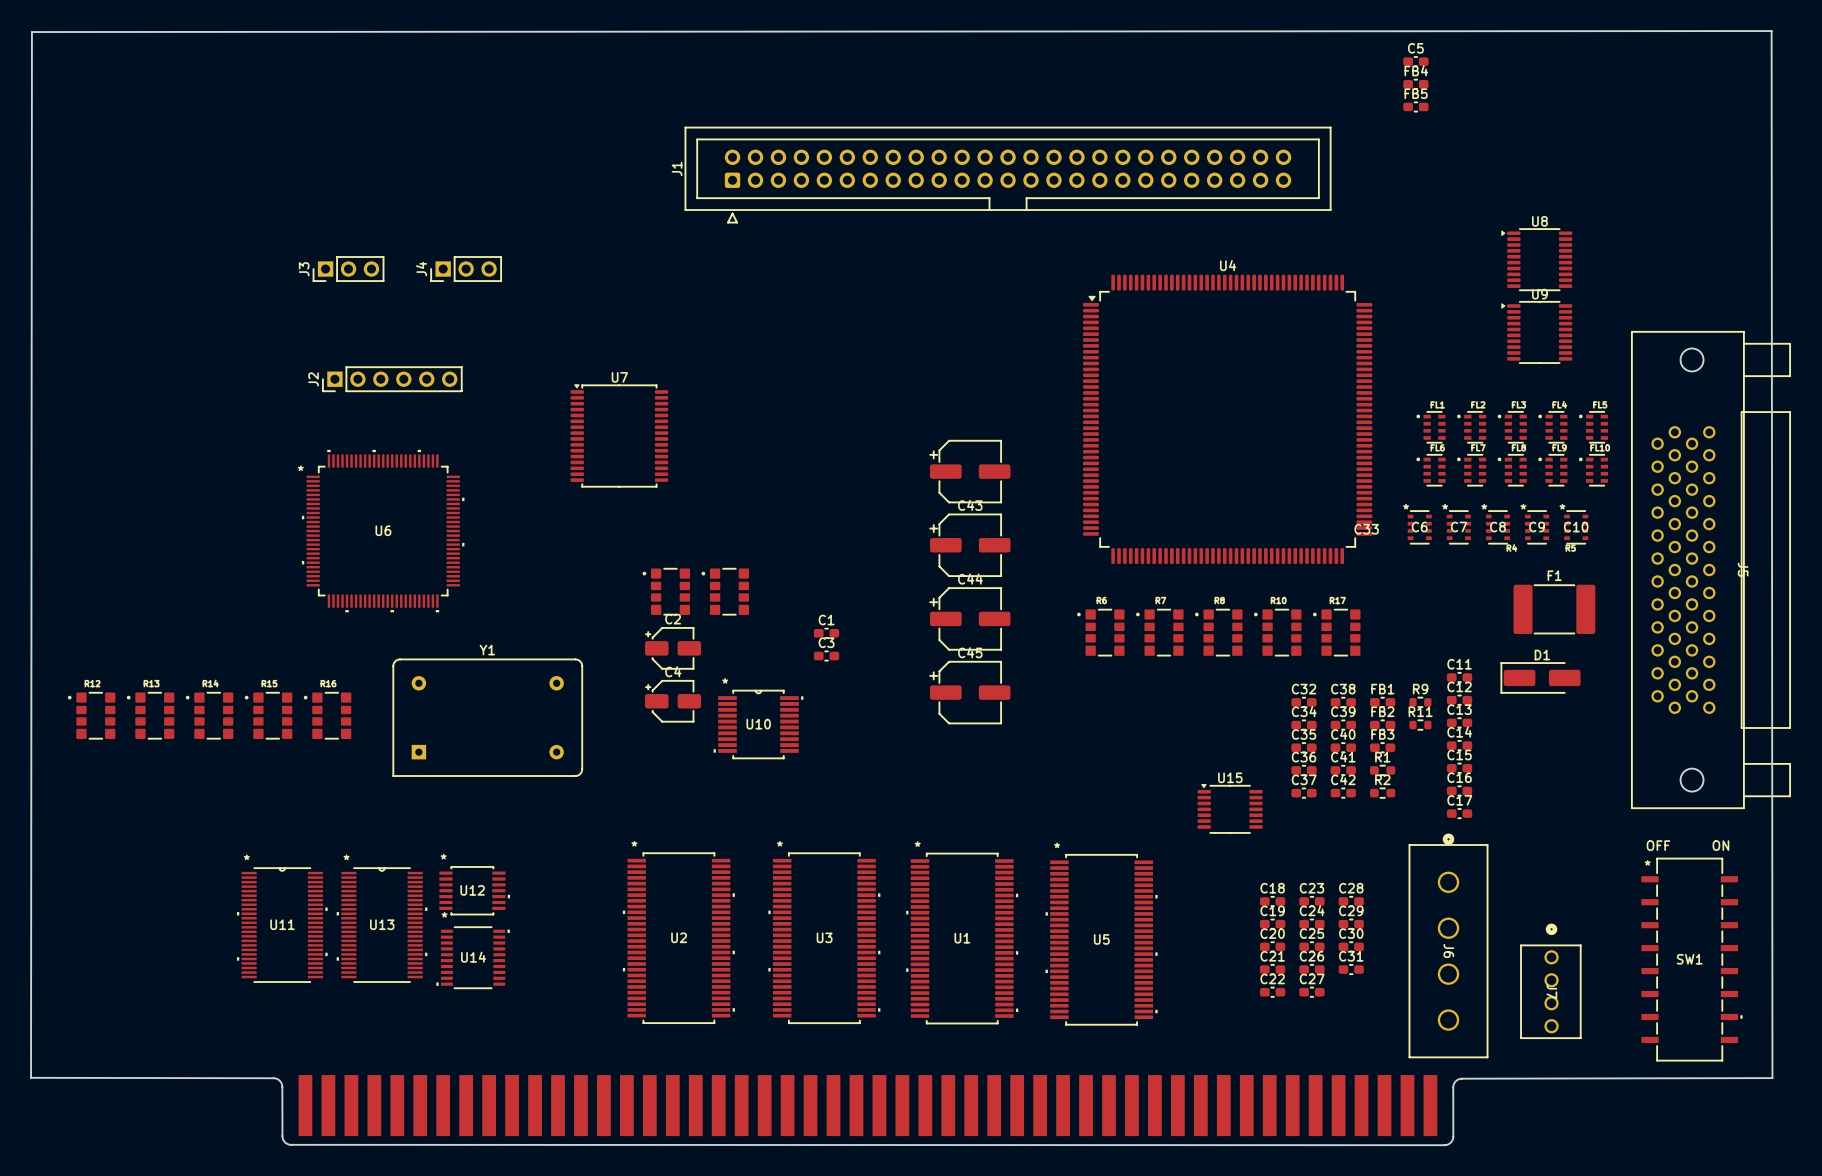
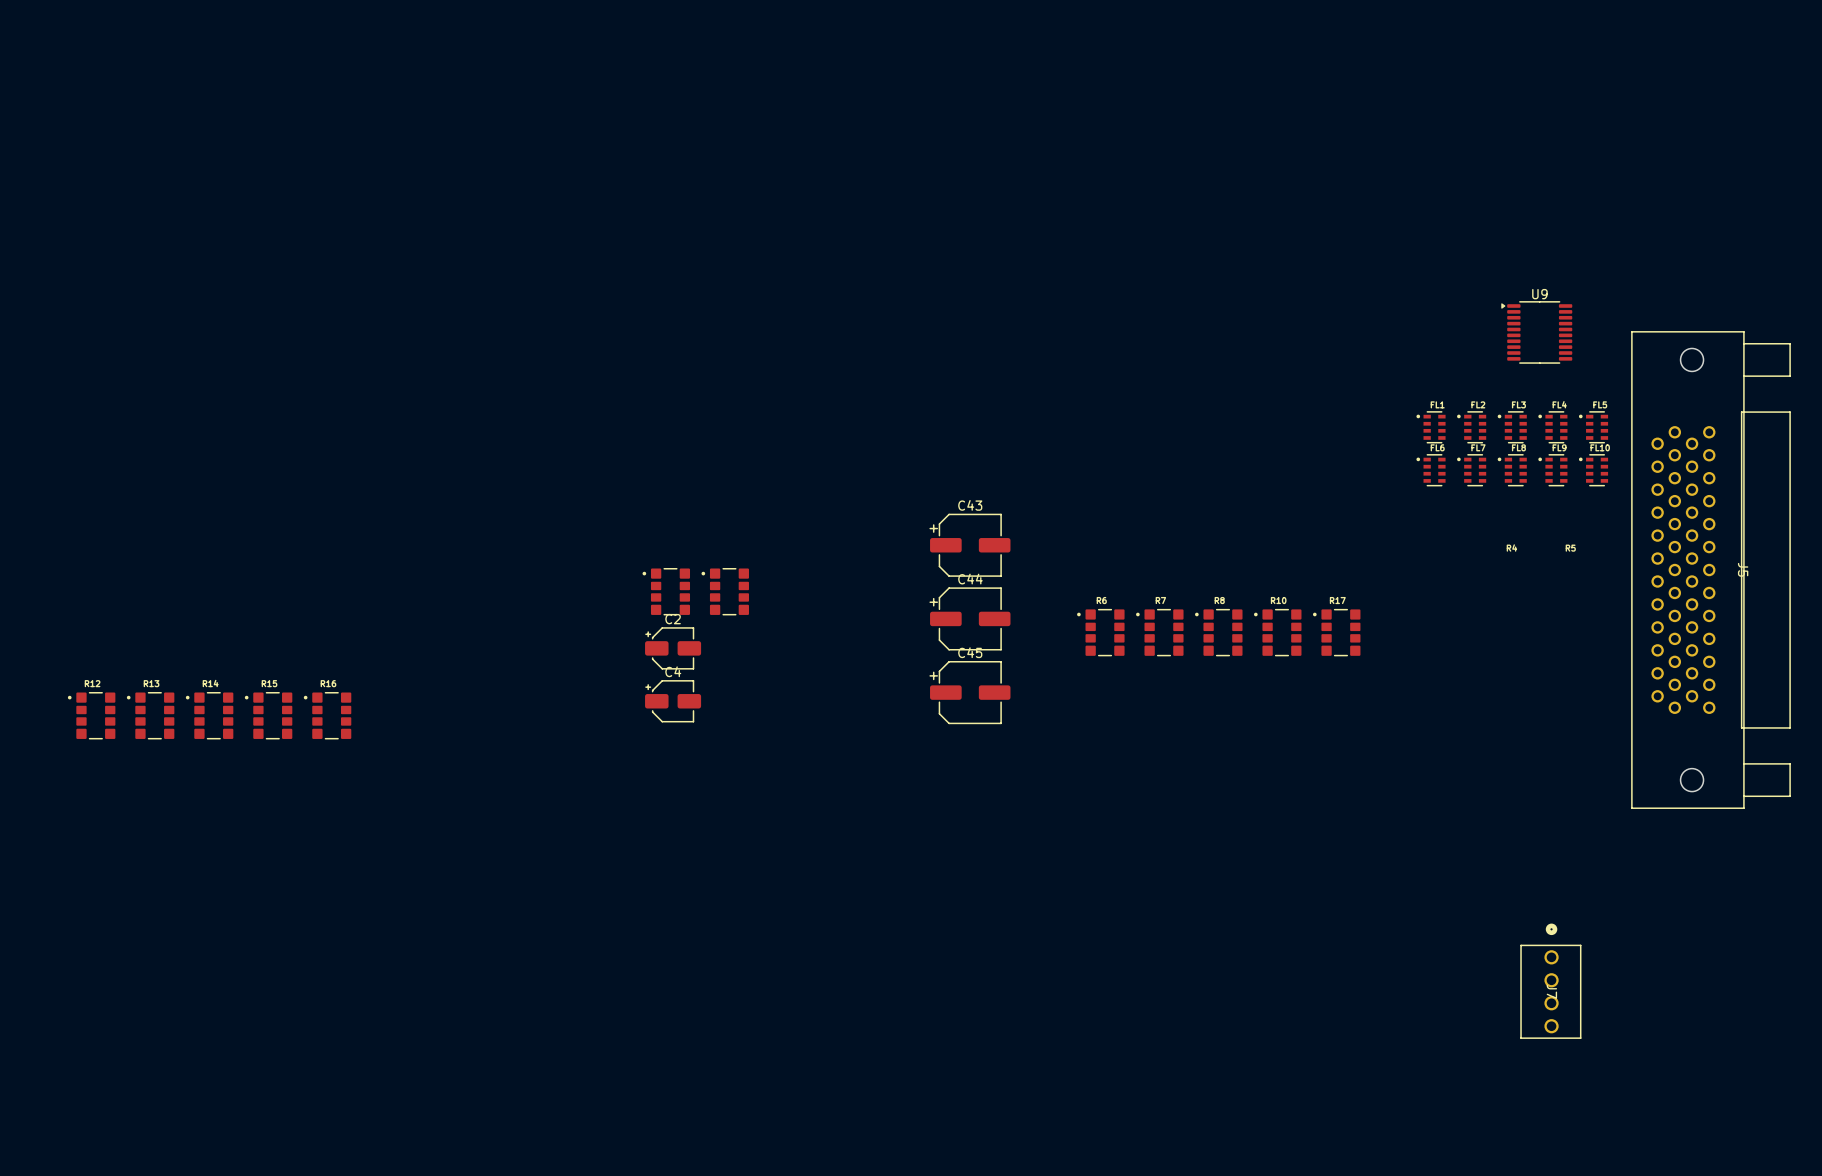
board edge: (1771, 31) (1772, 1078) (1460, 1078) (1455, 1081) (1453, 1086) (1453, 1138) (1450, 1143) (1444, 1145) (291, 1144) (285, 1142) (282, 1138) (282, 1086) (279, 1080) (275, 1078) (31, 1077) (31, 32) (1771, 31) -> none
C5: (1415, 61) -> none
FB4: (1415, 84) -> none
FB5: (1415, 106) -> none
J1: (1008, 175) -> none
U8: (1536, 259) -> none
J3: (348, 269) -> none
J4: (466, 269) -> none
J2: (392, 379) -> none
U4: (1227, 419) -> none
U7: (619, 435) -> none
C33: (970, 471) -> none
C6: (1419, 527) -> none
C7: (1458, 527) -> none
C8: (1497, 527) -> none
C9: (1537, 527) -> none
C10: (1576, 527) -> none
U6: (383, 531) -> none
F1: (1554, 609) -> none
C1: (826, 633) -> none
C3: (826, 655) -> none
C11: (1459, 677) -> none
D1: (1540, 677) -> none
C12: (1459, 700) -> none
C32: (1303, 702) -> none
C38: (1343, 702) -> none
FB1: (1382, 702) -> none
R9: (1420, 702) -> none
Y1: (487, 717) -> none
C13: (1459, 722) -> none
U10: (758, 724) -> none
C34: (1303, 725) -> none
C39: (1343, 725) -> none
FB2: (1382, 725) -> none
R11: (1420, 725) -> none
C14: (1459, 745) -> none
C35: (1303, 747) -> none
C40: (1343, 747) -> none
FB3: (1382, 747) -> none
C15: (1459, 768) -> none
C36: (1303, 770) -> none
C41: (1343, 770) -> none
R1: (1382, 770) -> none
C16: (1459, 790) -> none
C37: (1303, 793) -> none
C42: (1343, 793) -> none
R2: (1382, 793) -> none
U15: (1230, 808) -> none
C17: (1459, 813) -> none
U12: (474, 890) -> none
C18: (1272, 901) -> none
C23: (1311, 901) -> none
C28: (1351, 901) -> none
C19: (1272, 924) -> none
C24: (1311, 924) -> none
C29: (1351, 924) -> none
U11: (282, 925) -> none
U13: (382, 925) -> none
U2: (678, 938) -> none
U3: (824, 938) -> none
U1: (962, 938) -> none
U5: (1101, 939) -> none
J6: (1448, 945) -> none
C20: (1272, 946) -> none
C25: (1311, 946) -> none
C30: (1351, 946) -> none
U14: (473, 957) -> none
SW1: (1692, 959) -> none
C21: (1272, 969) -> none
C26: (1311, 969) -> none
C31: (1351, 969) -> none
C22: (1272, 992) -> none
C27: (1311, 992) -> none
part: (867, 1105) -> none

